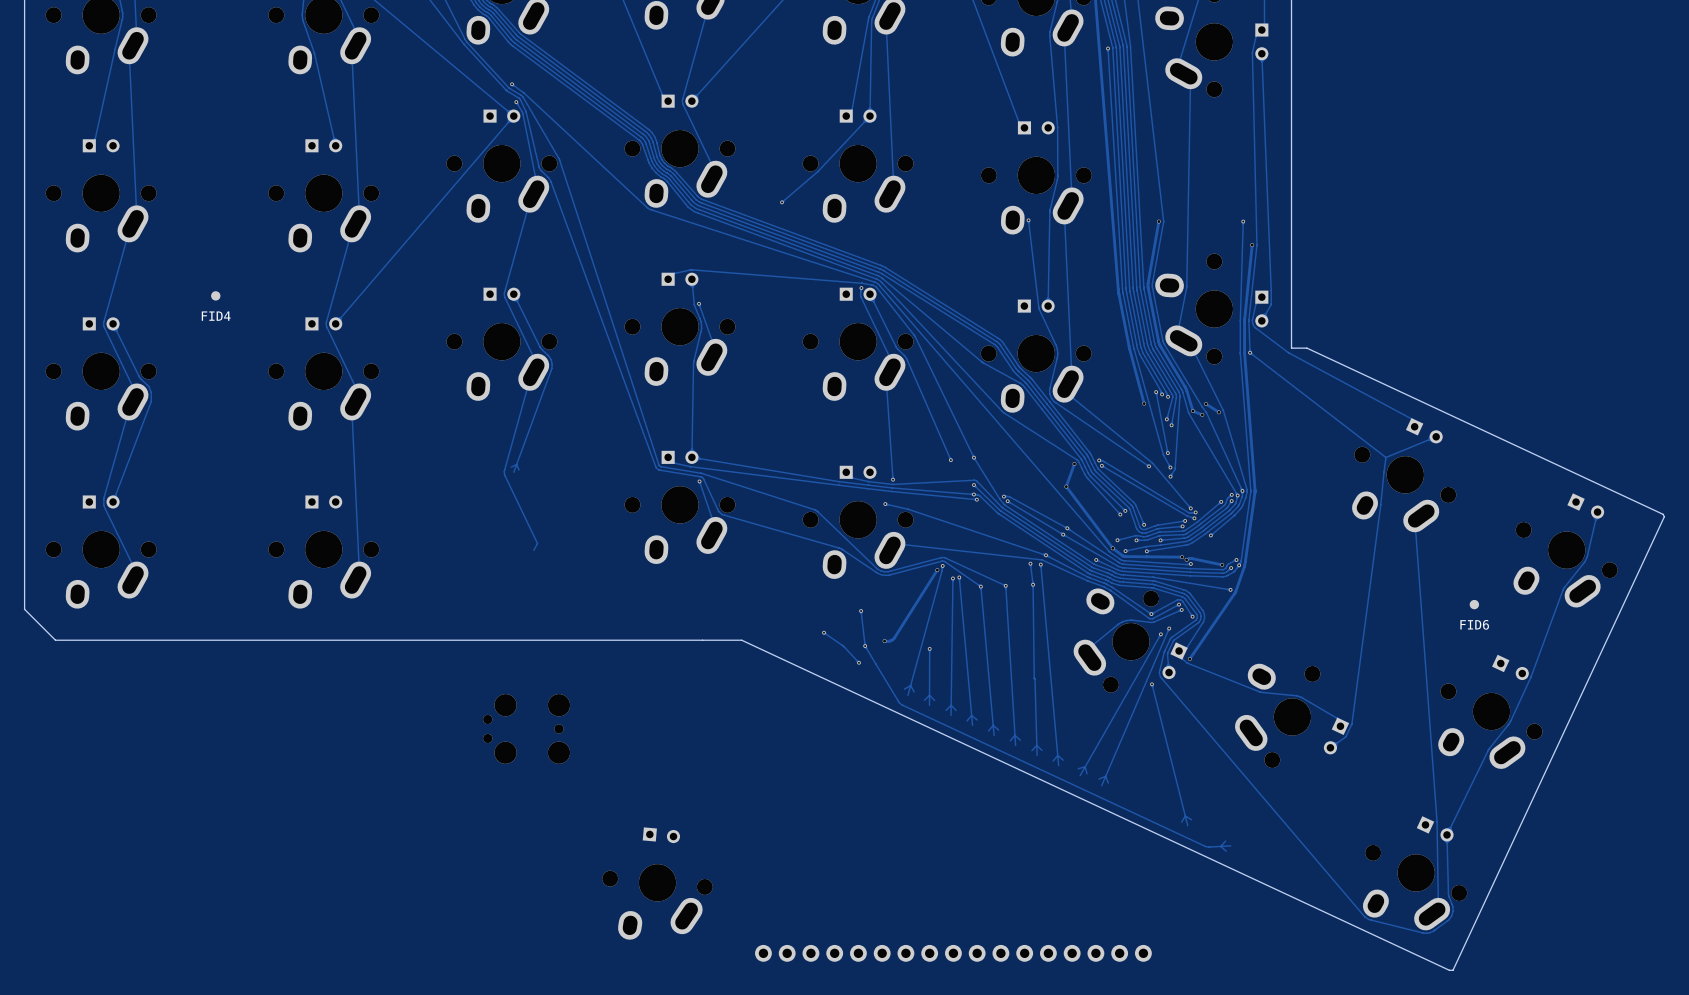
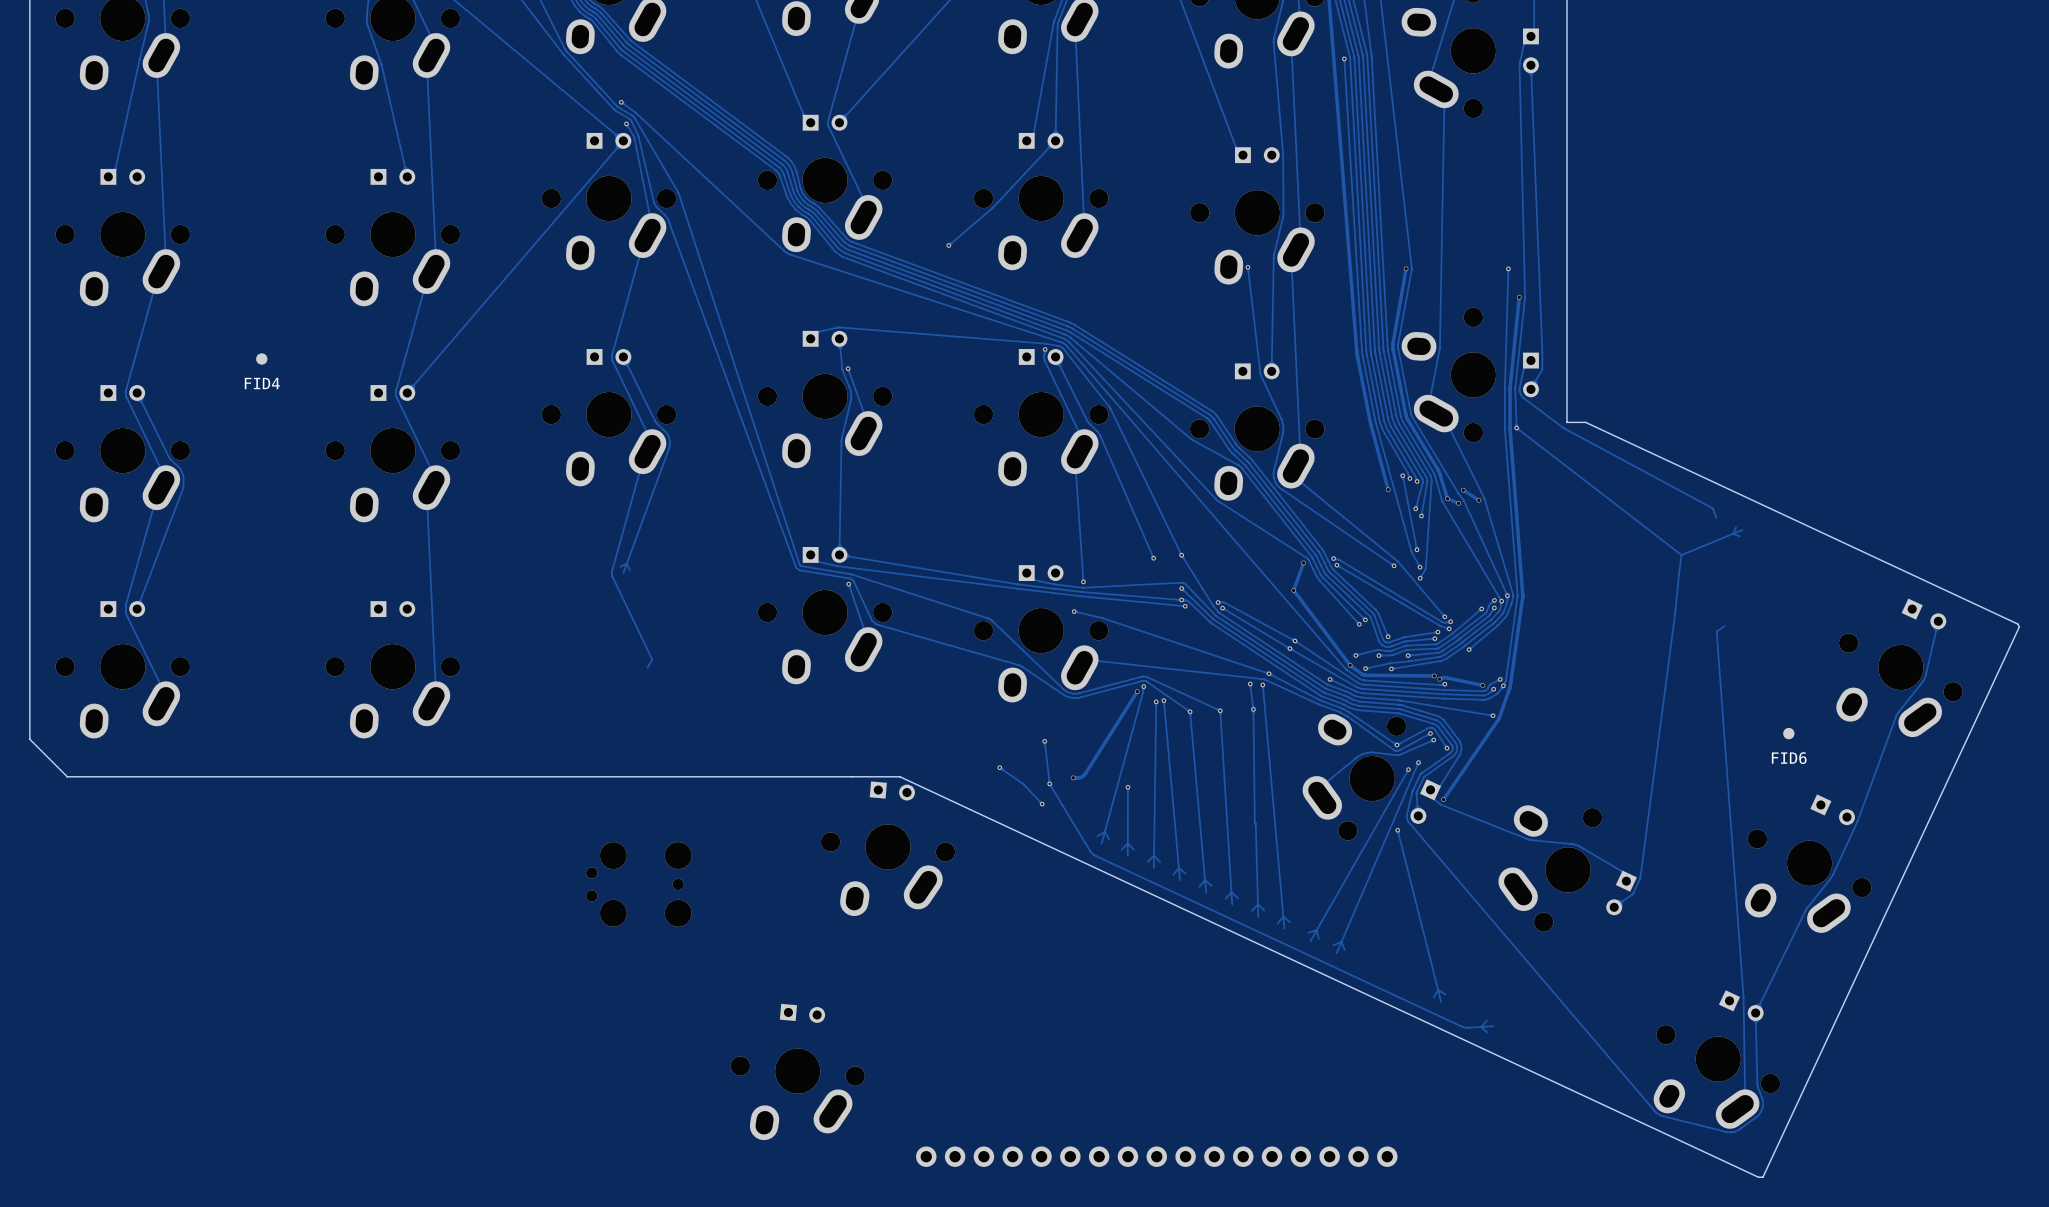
part: (1424, 430) -> none
part: (1404, 489) -> none
part: none -> (892, 790)
part: none -> (888, 870)

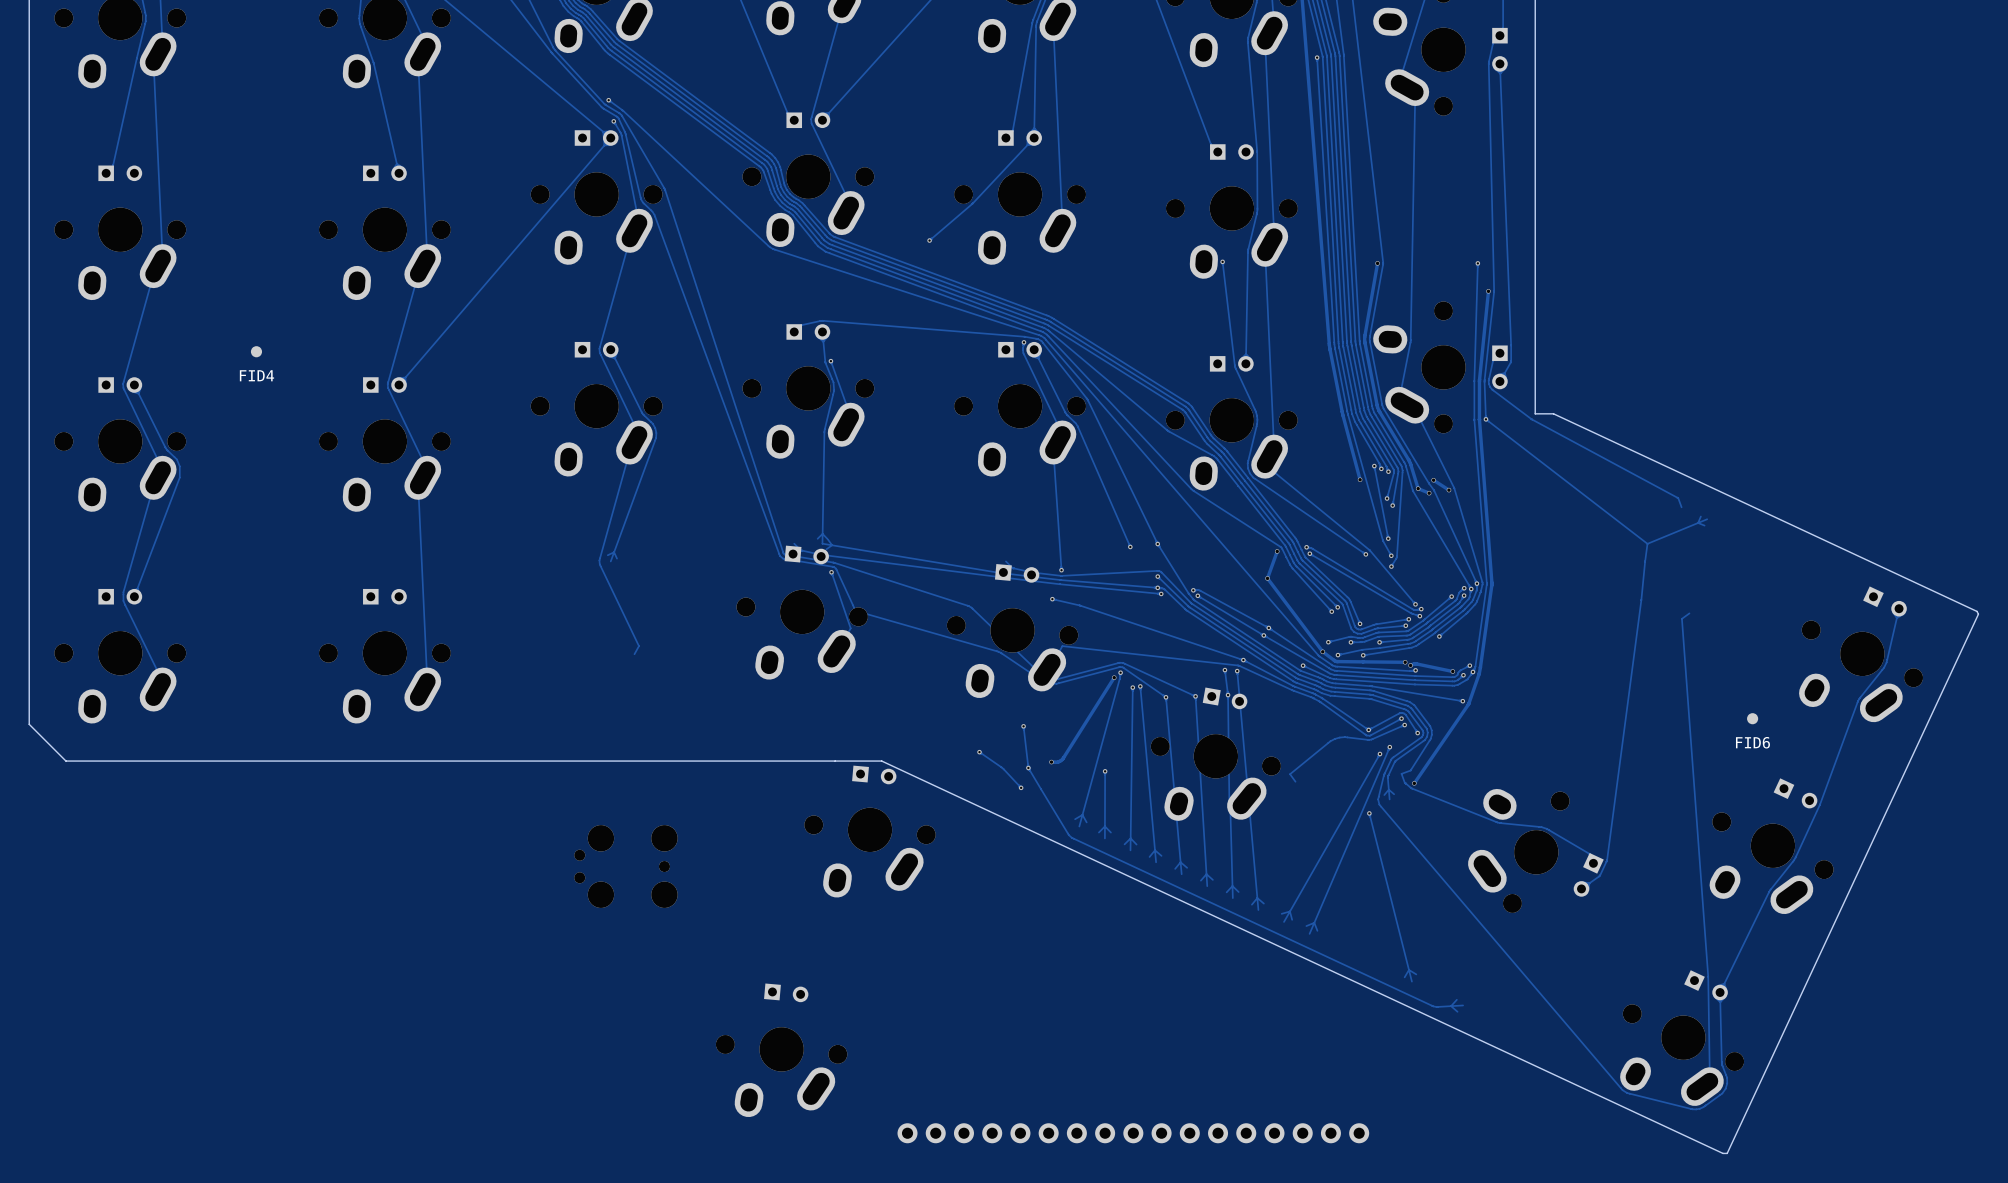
part: (825, 554) -> none
part: none -> (806, 554)
part: (1041, 573) -> none
part: none -> (1017, 573)
part: (825, 637) -> none
part: none -> (802, 634)
part: (1041, 655) -> none
part: none -> (1012, 653)
part: none -> (1225, 698)
part: (1354, 777) -> none
part: none -> (1215, 777)
part: (1425, 801) -> none

